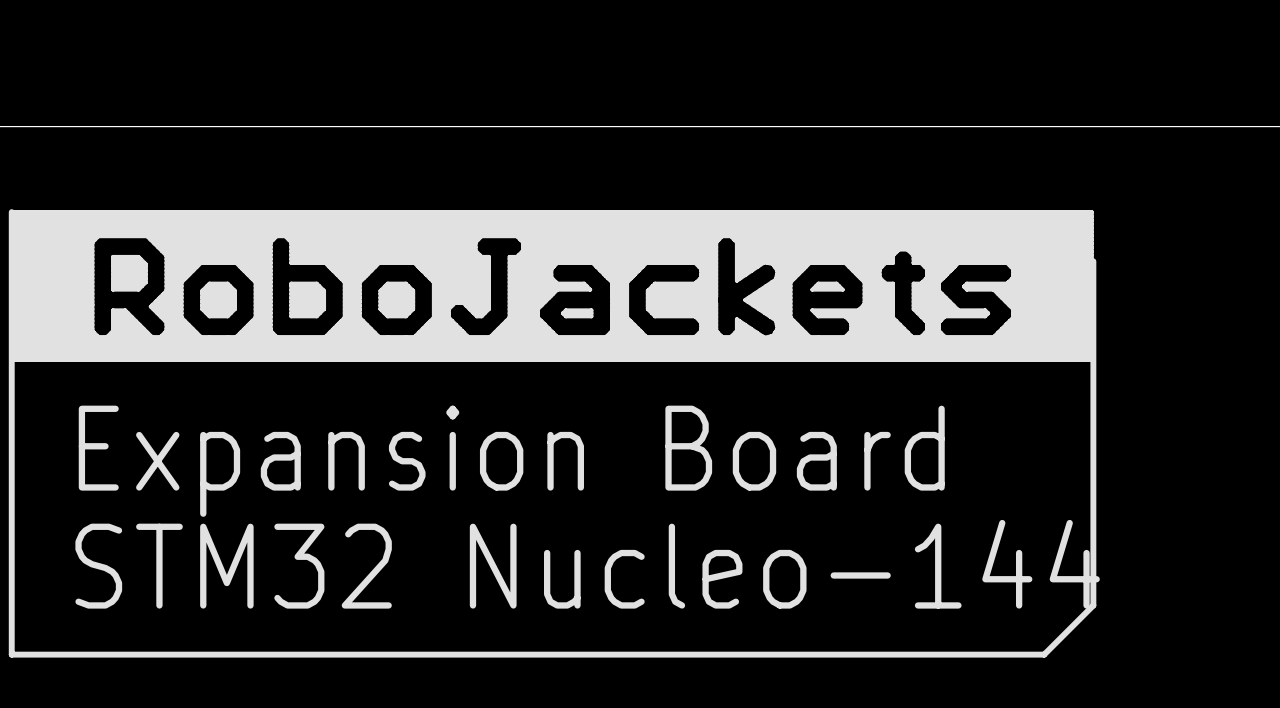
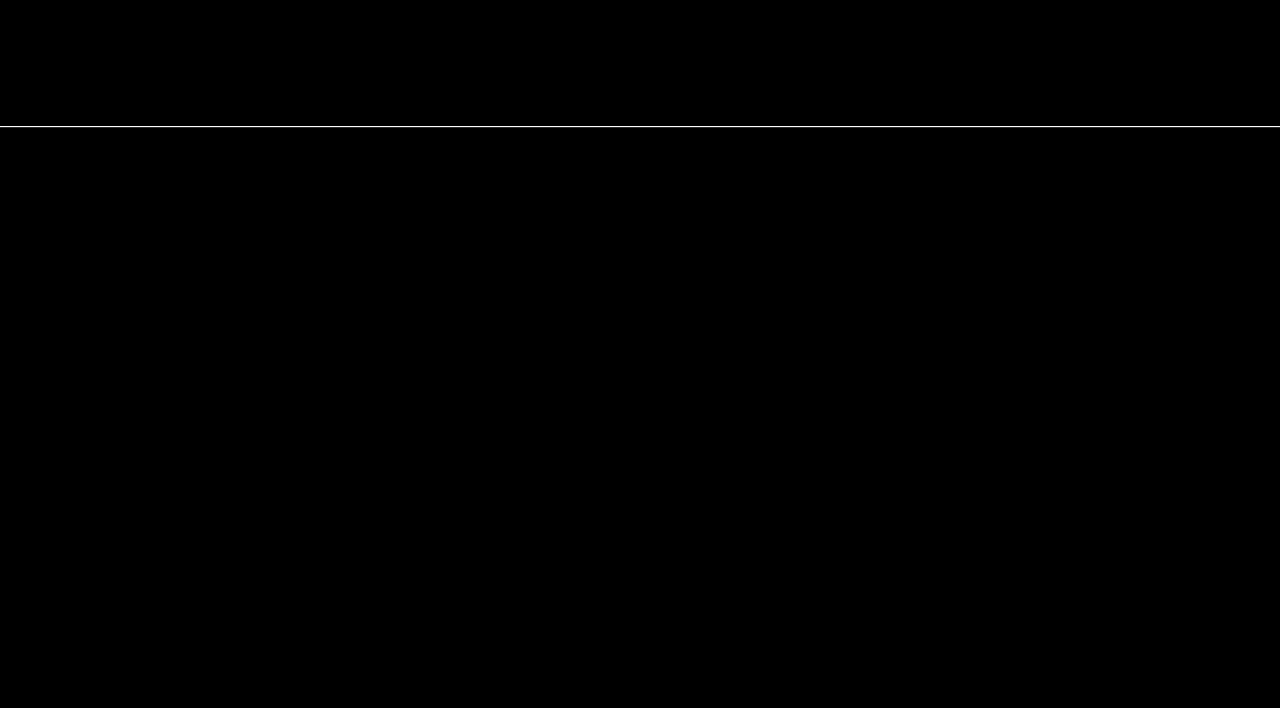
drawing: [9, 210, 1094, 362] -> none
line: (11, 212) (11, 654) (1044, 654) (1093, 605) (1093, 261) -> none
text: Expansion Board (511, 461) -> none
text: STM32 Nucleo-144 (587, 564) -> none

